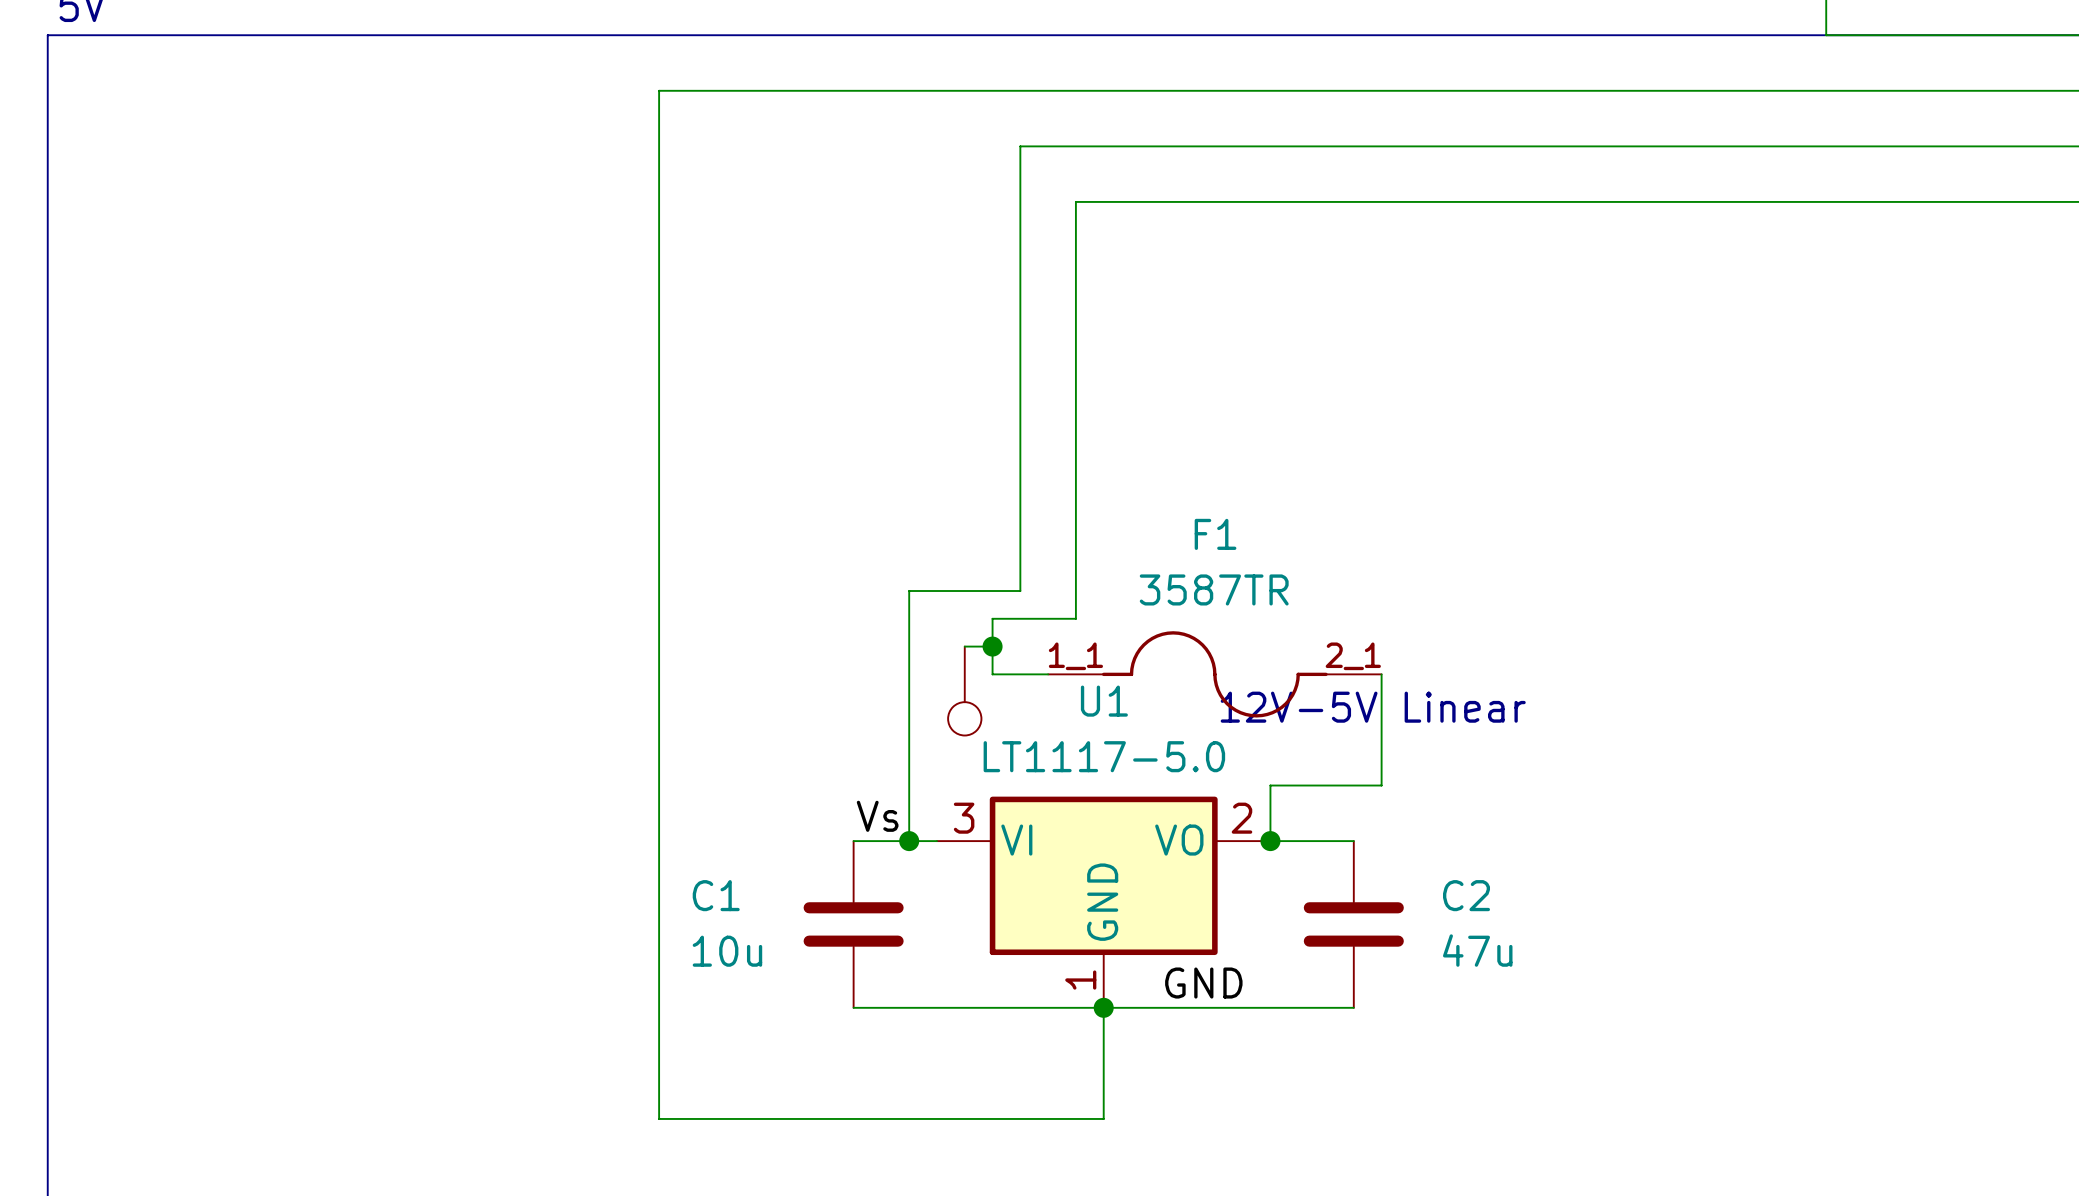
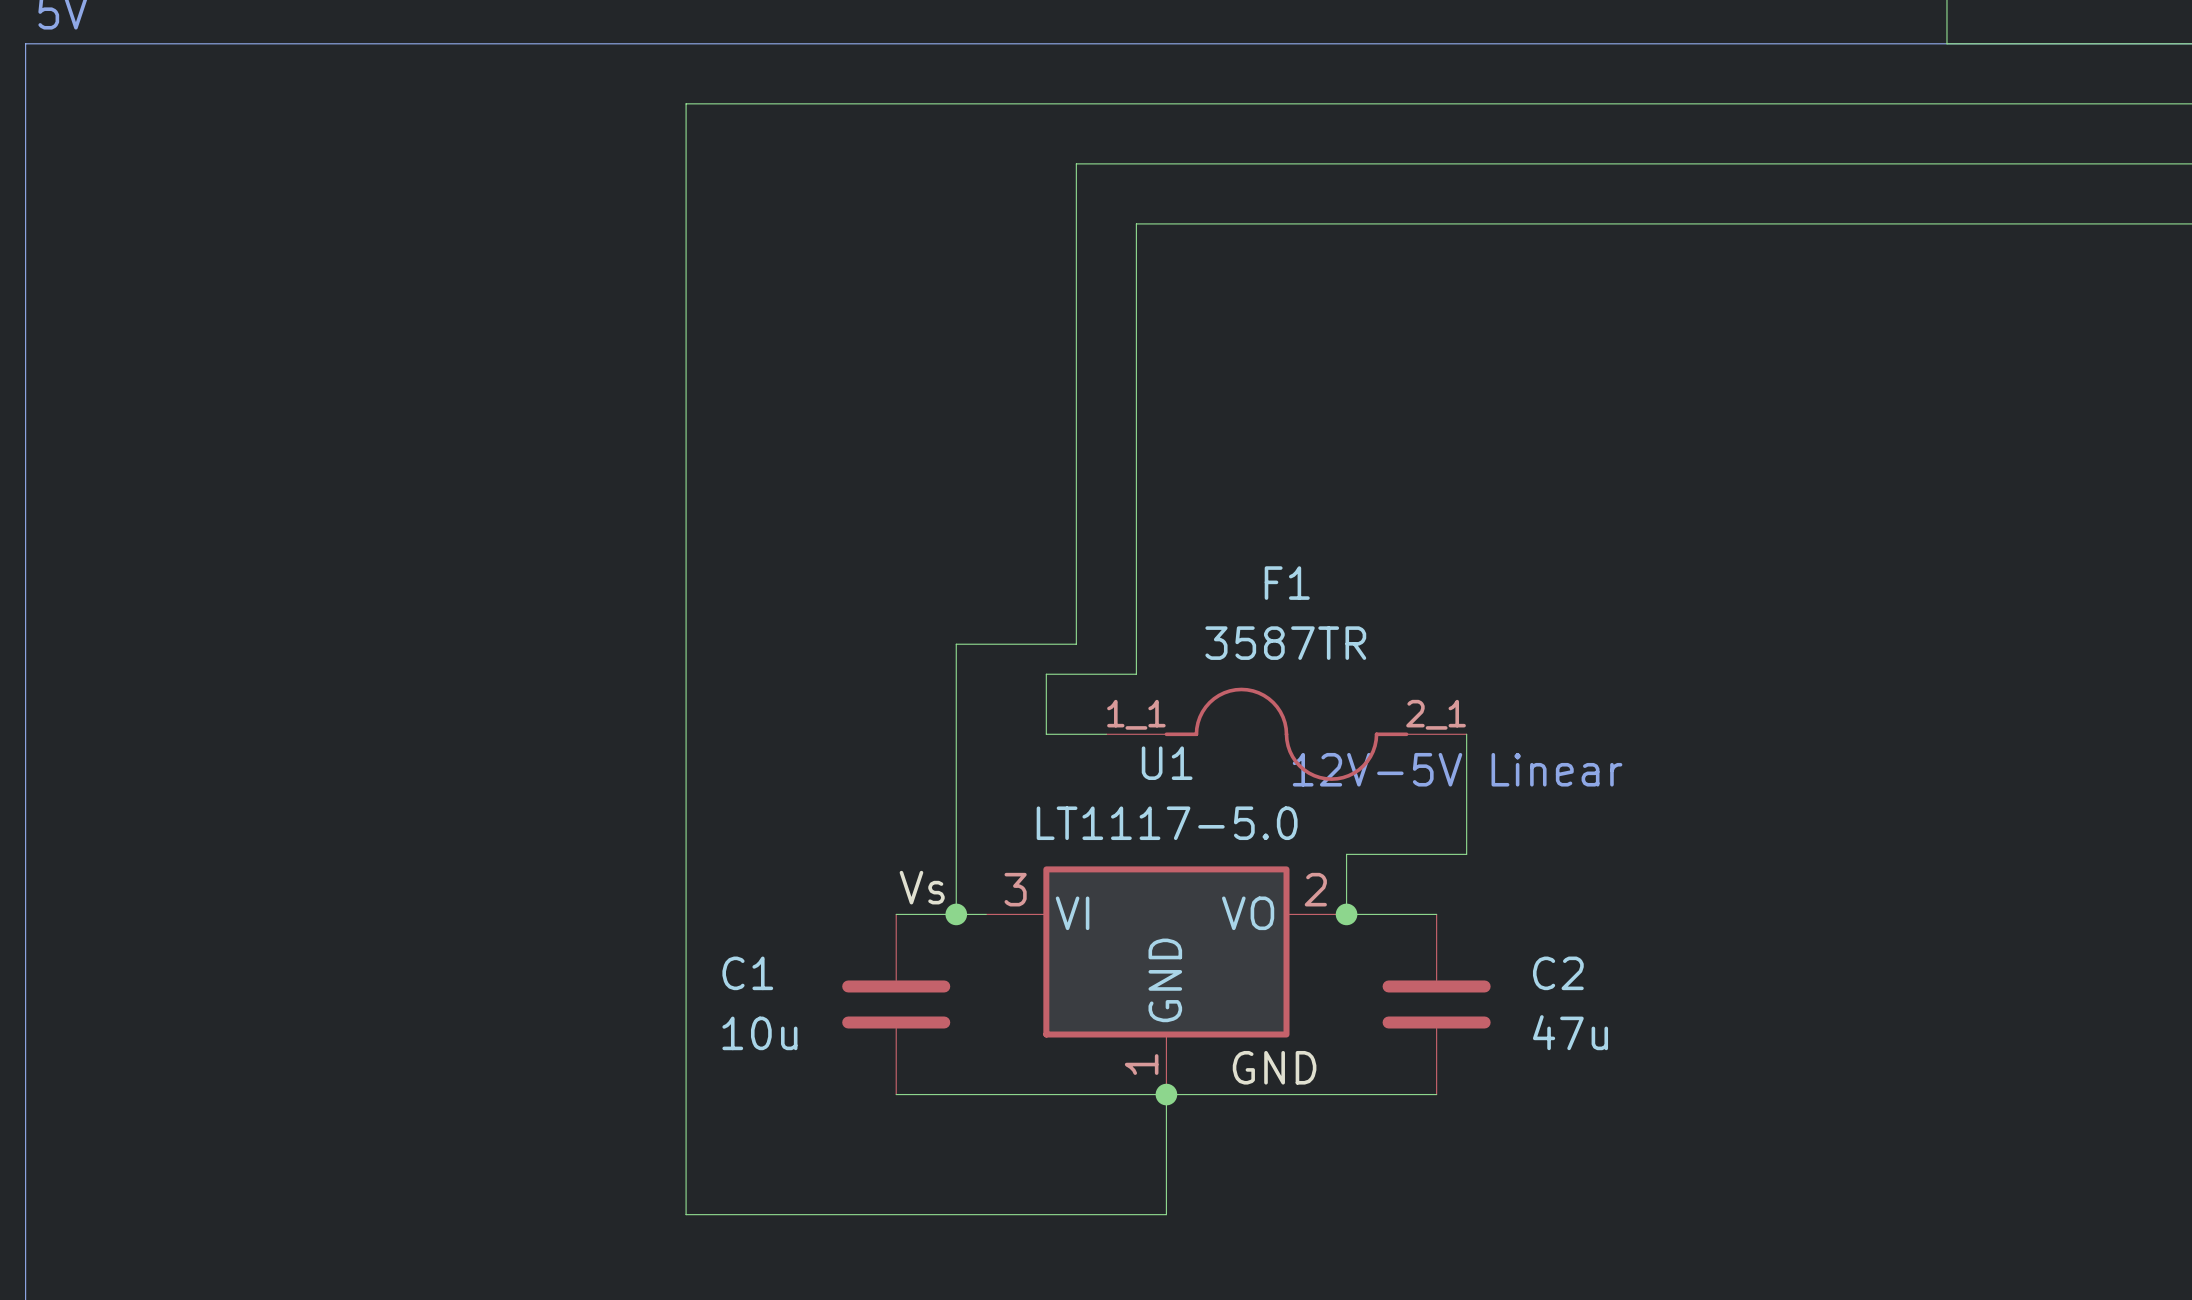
wire: (964, 646) (992, 646) -> none
junction: (992, 646) -> none
part: (964, 691) -> none

